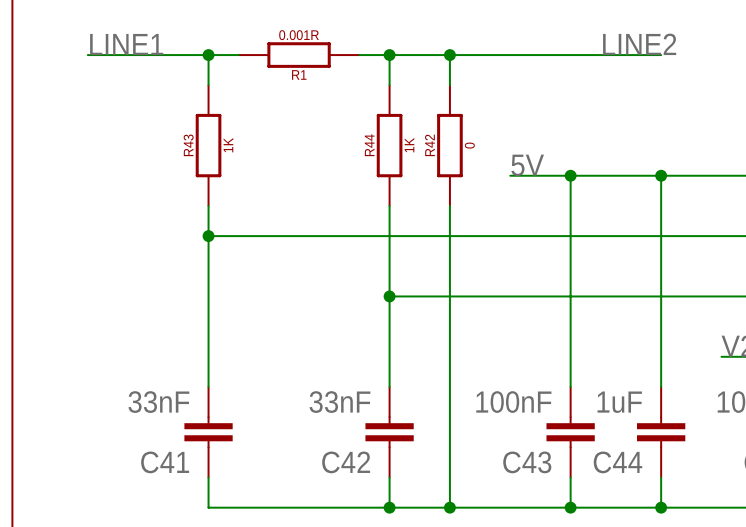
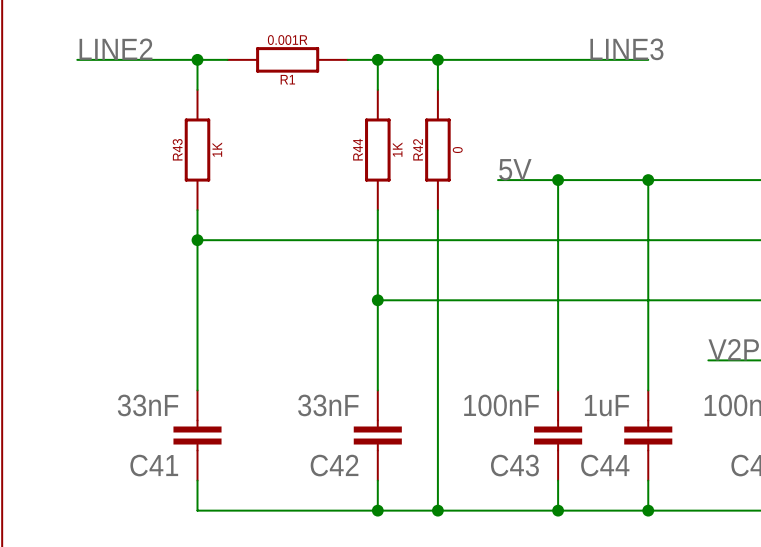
label: LINE1 (126, 44) -> LINE2 (115, 49)
label: LINE2 (639, 44) -> LINE3 (626, 49)

